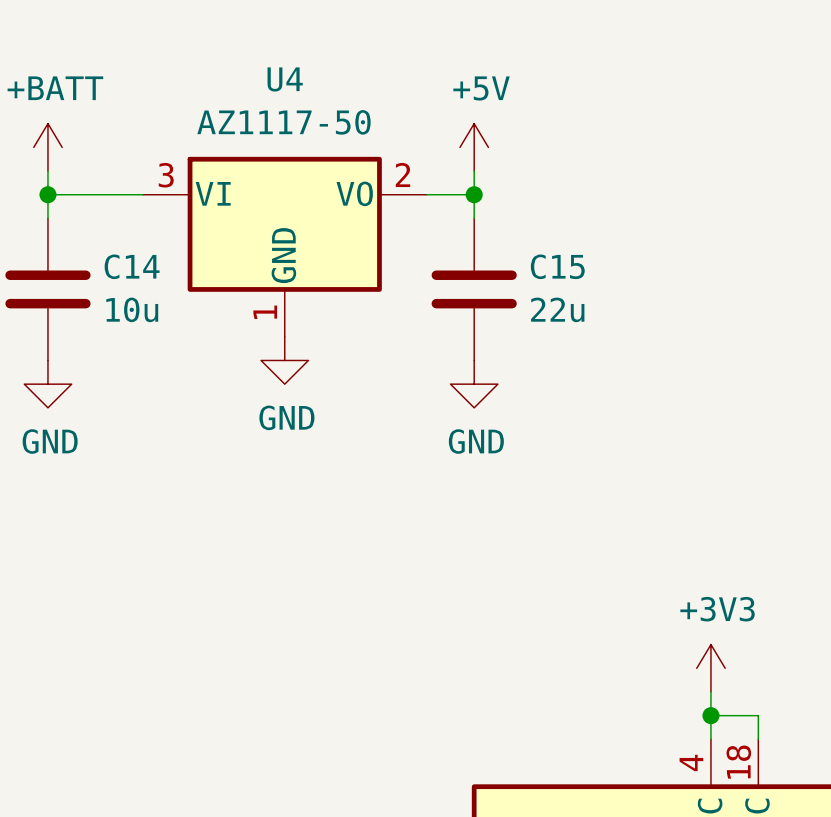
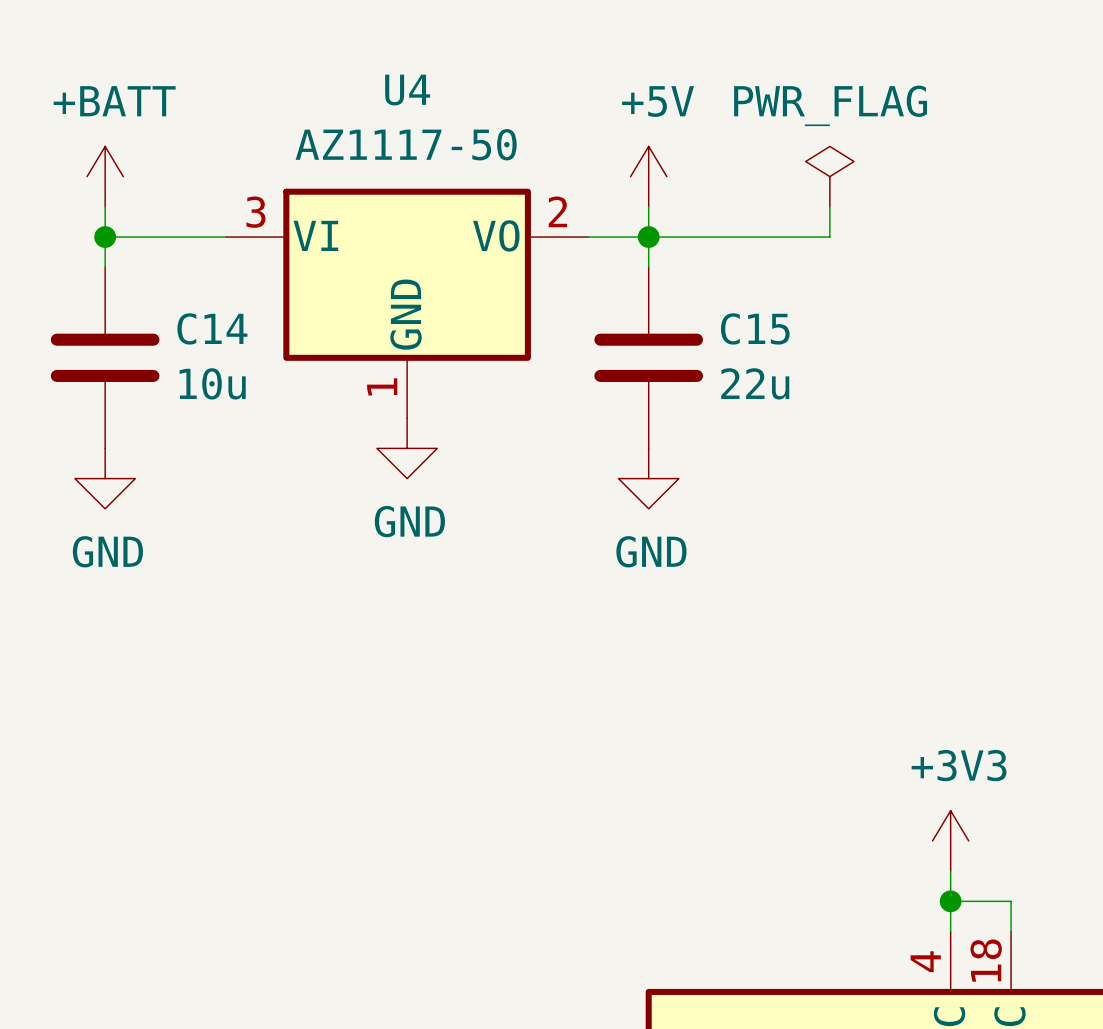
power symbol: none -> PWR_FLAG (829, 176)
wire: none -> (829, 206) (829, 237) (648, 237)

